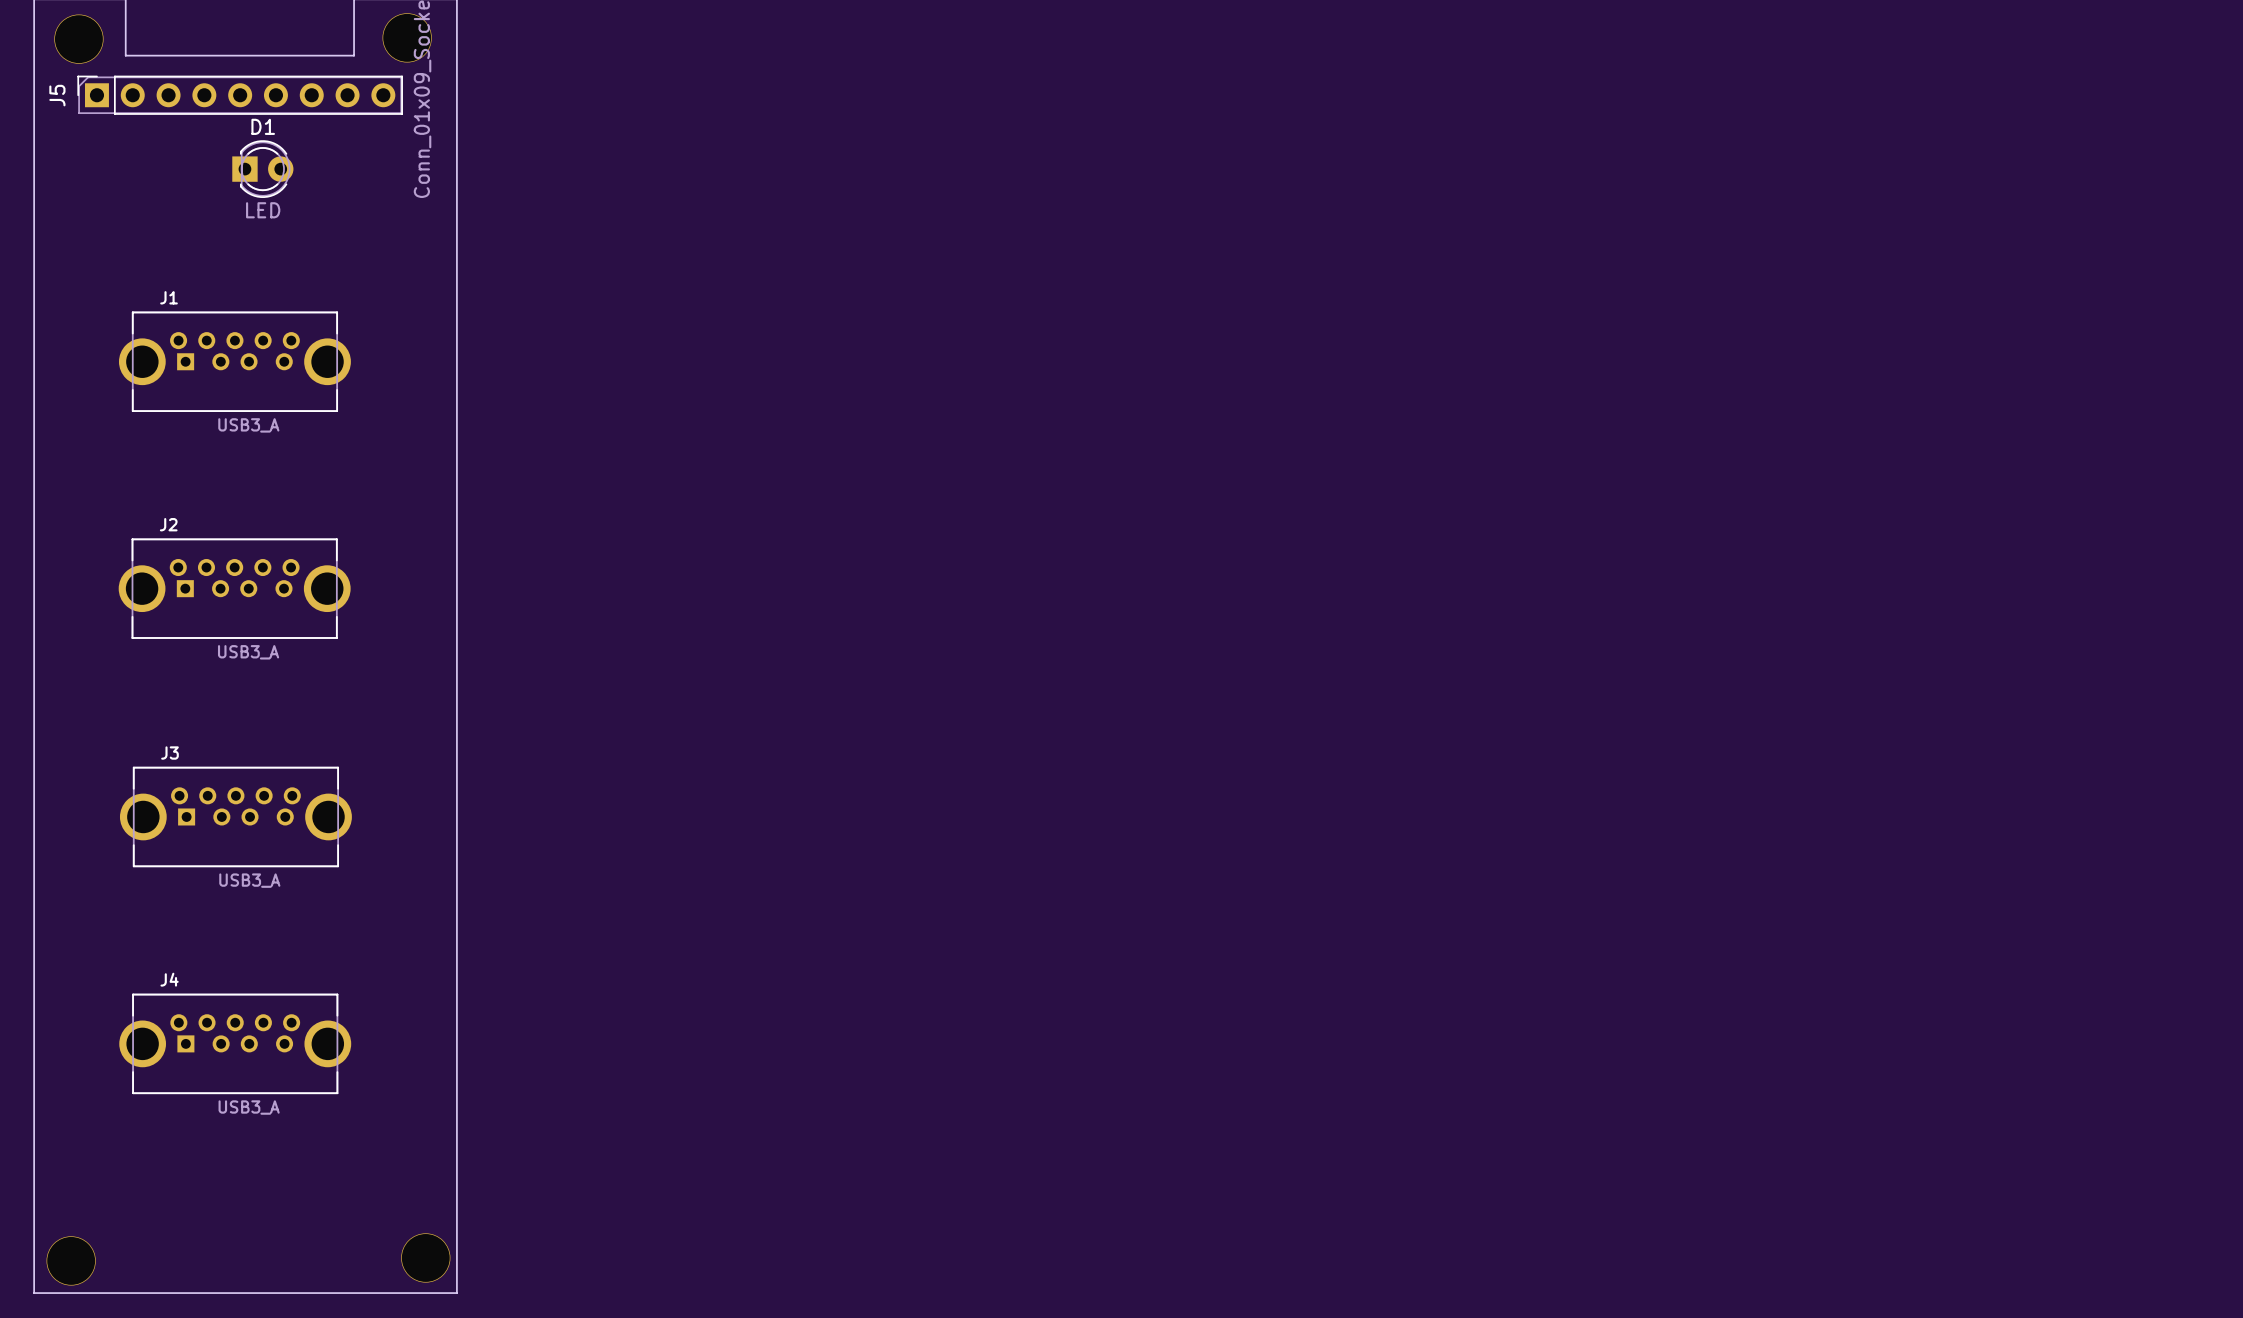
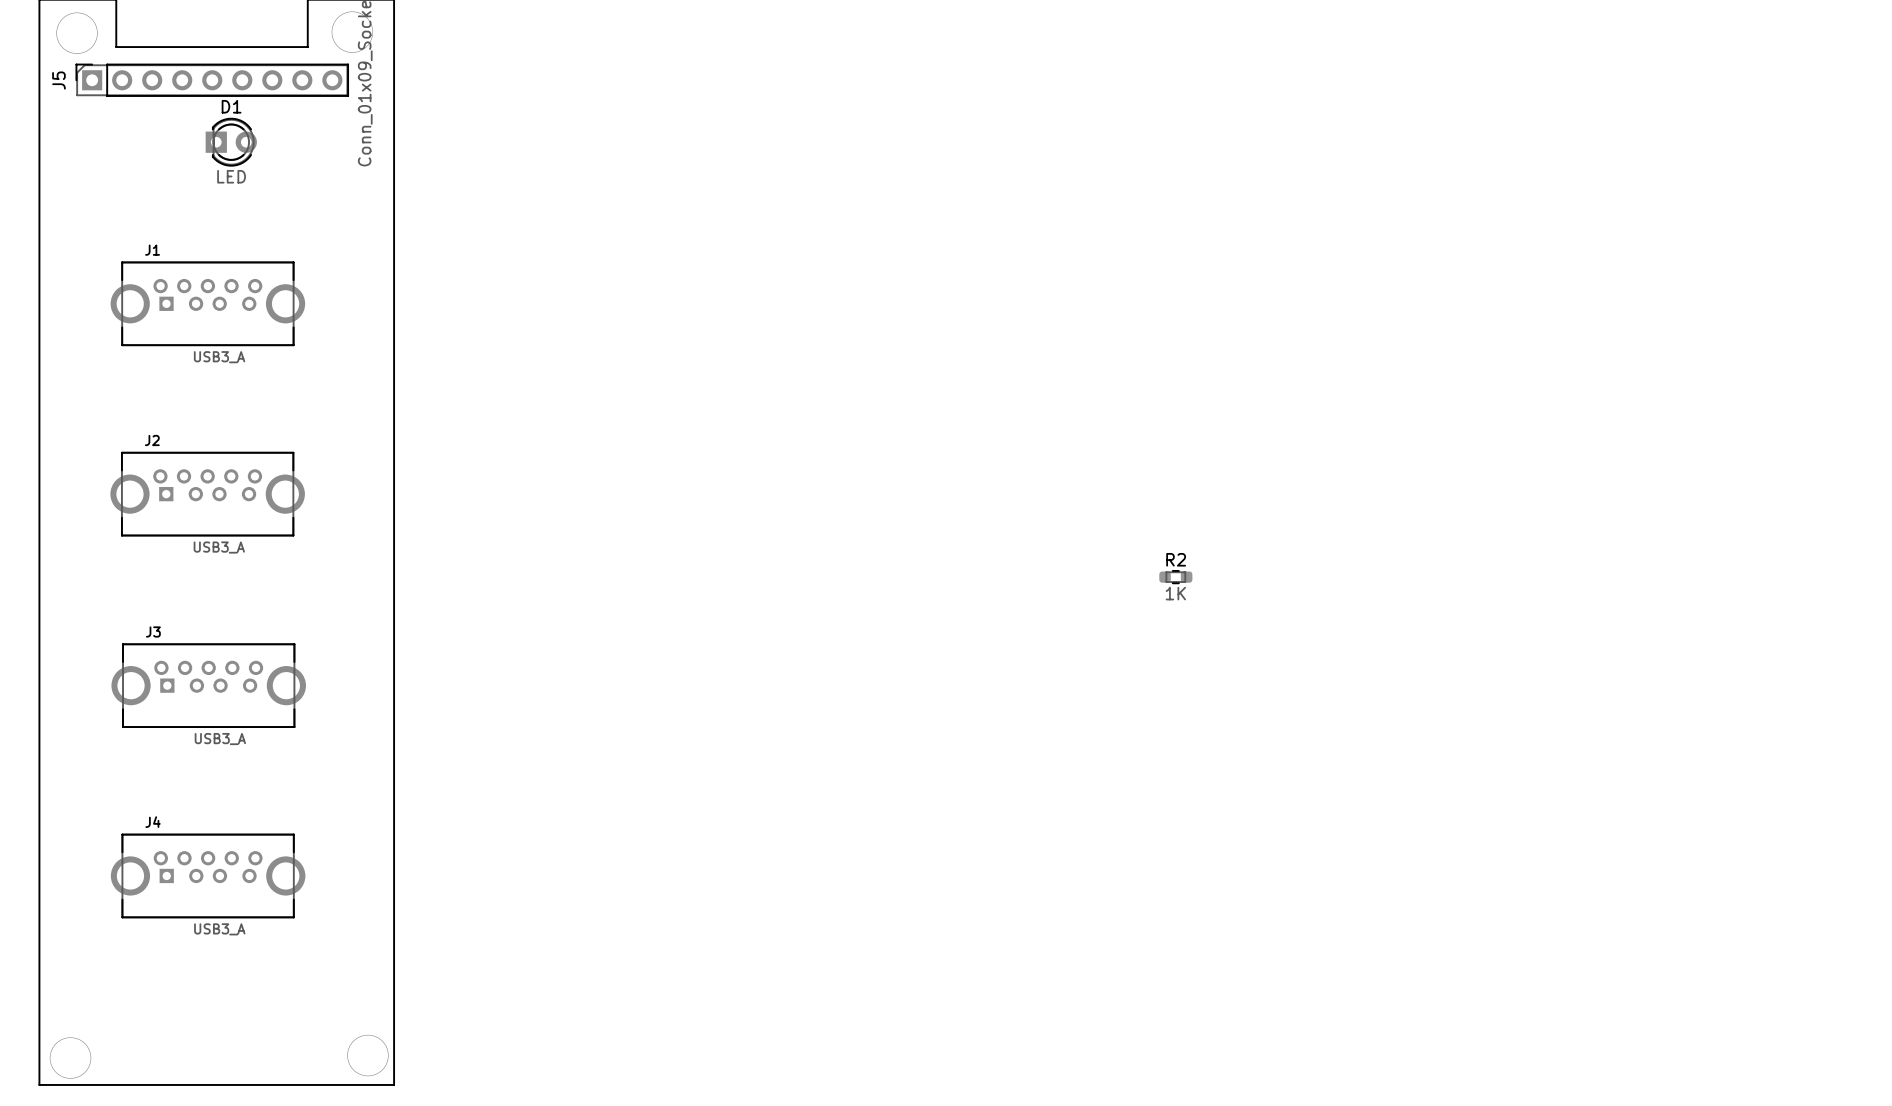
R2: none -> 1K (1175, 577)

